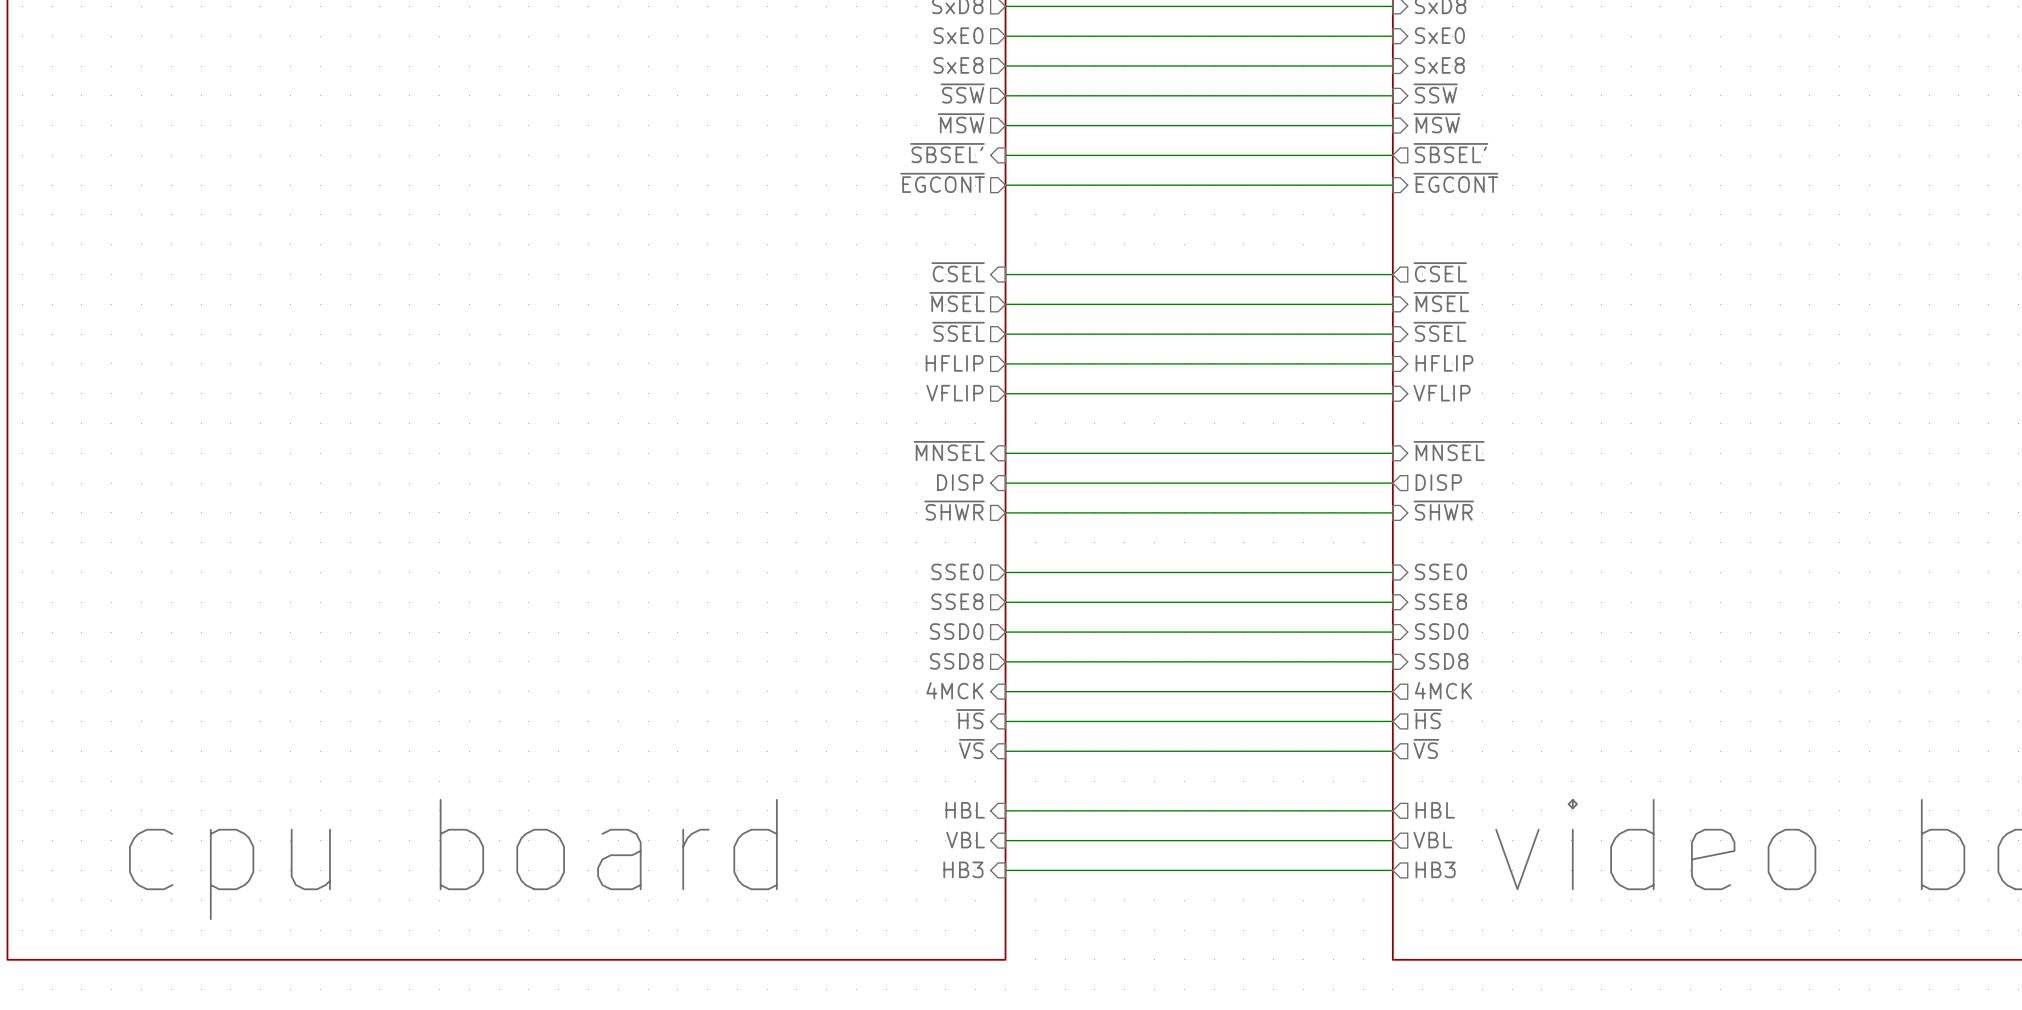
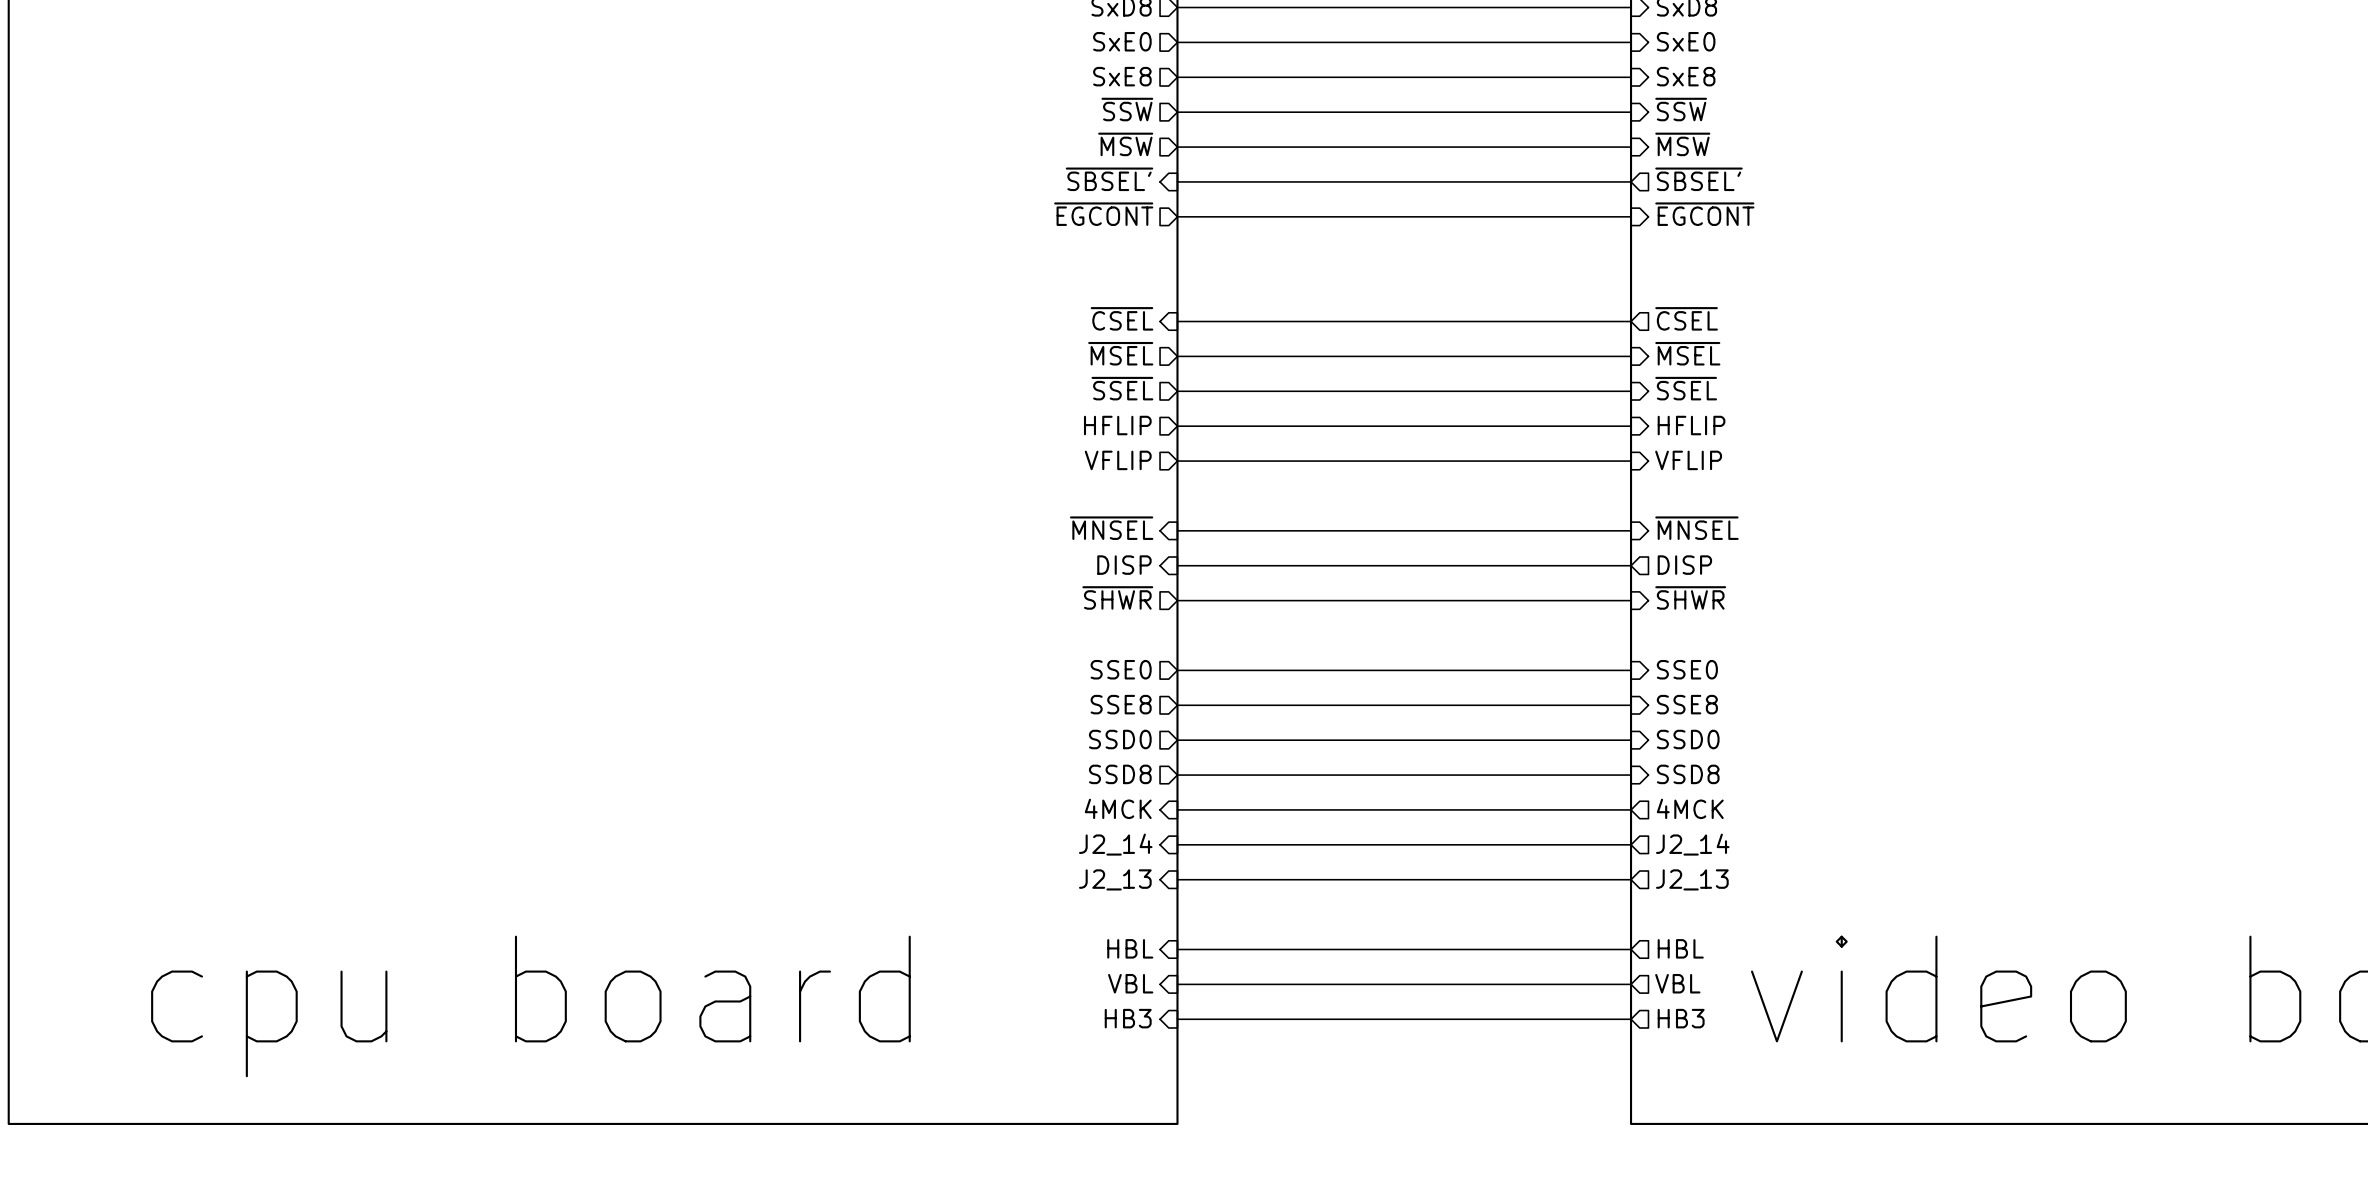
sheet pin: ~{HS} (970, 719) -> J2_14 (1115, 844)
sheet pin: ~{HS} (1427, 719) -> J2_14 (1692, 844)
sheet pin: ~{VS} (971, 748) -> J2_13 (1115, 879)
sheet pin: ~{VS} (1426, 748) -> J2_13 (1692, 879)

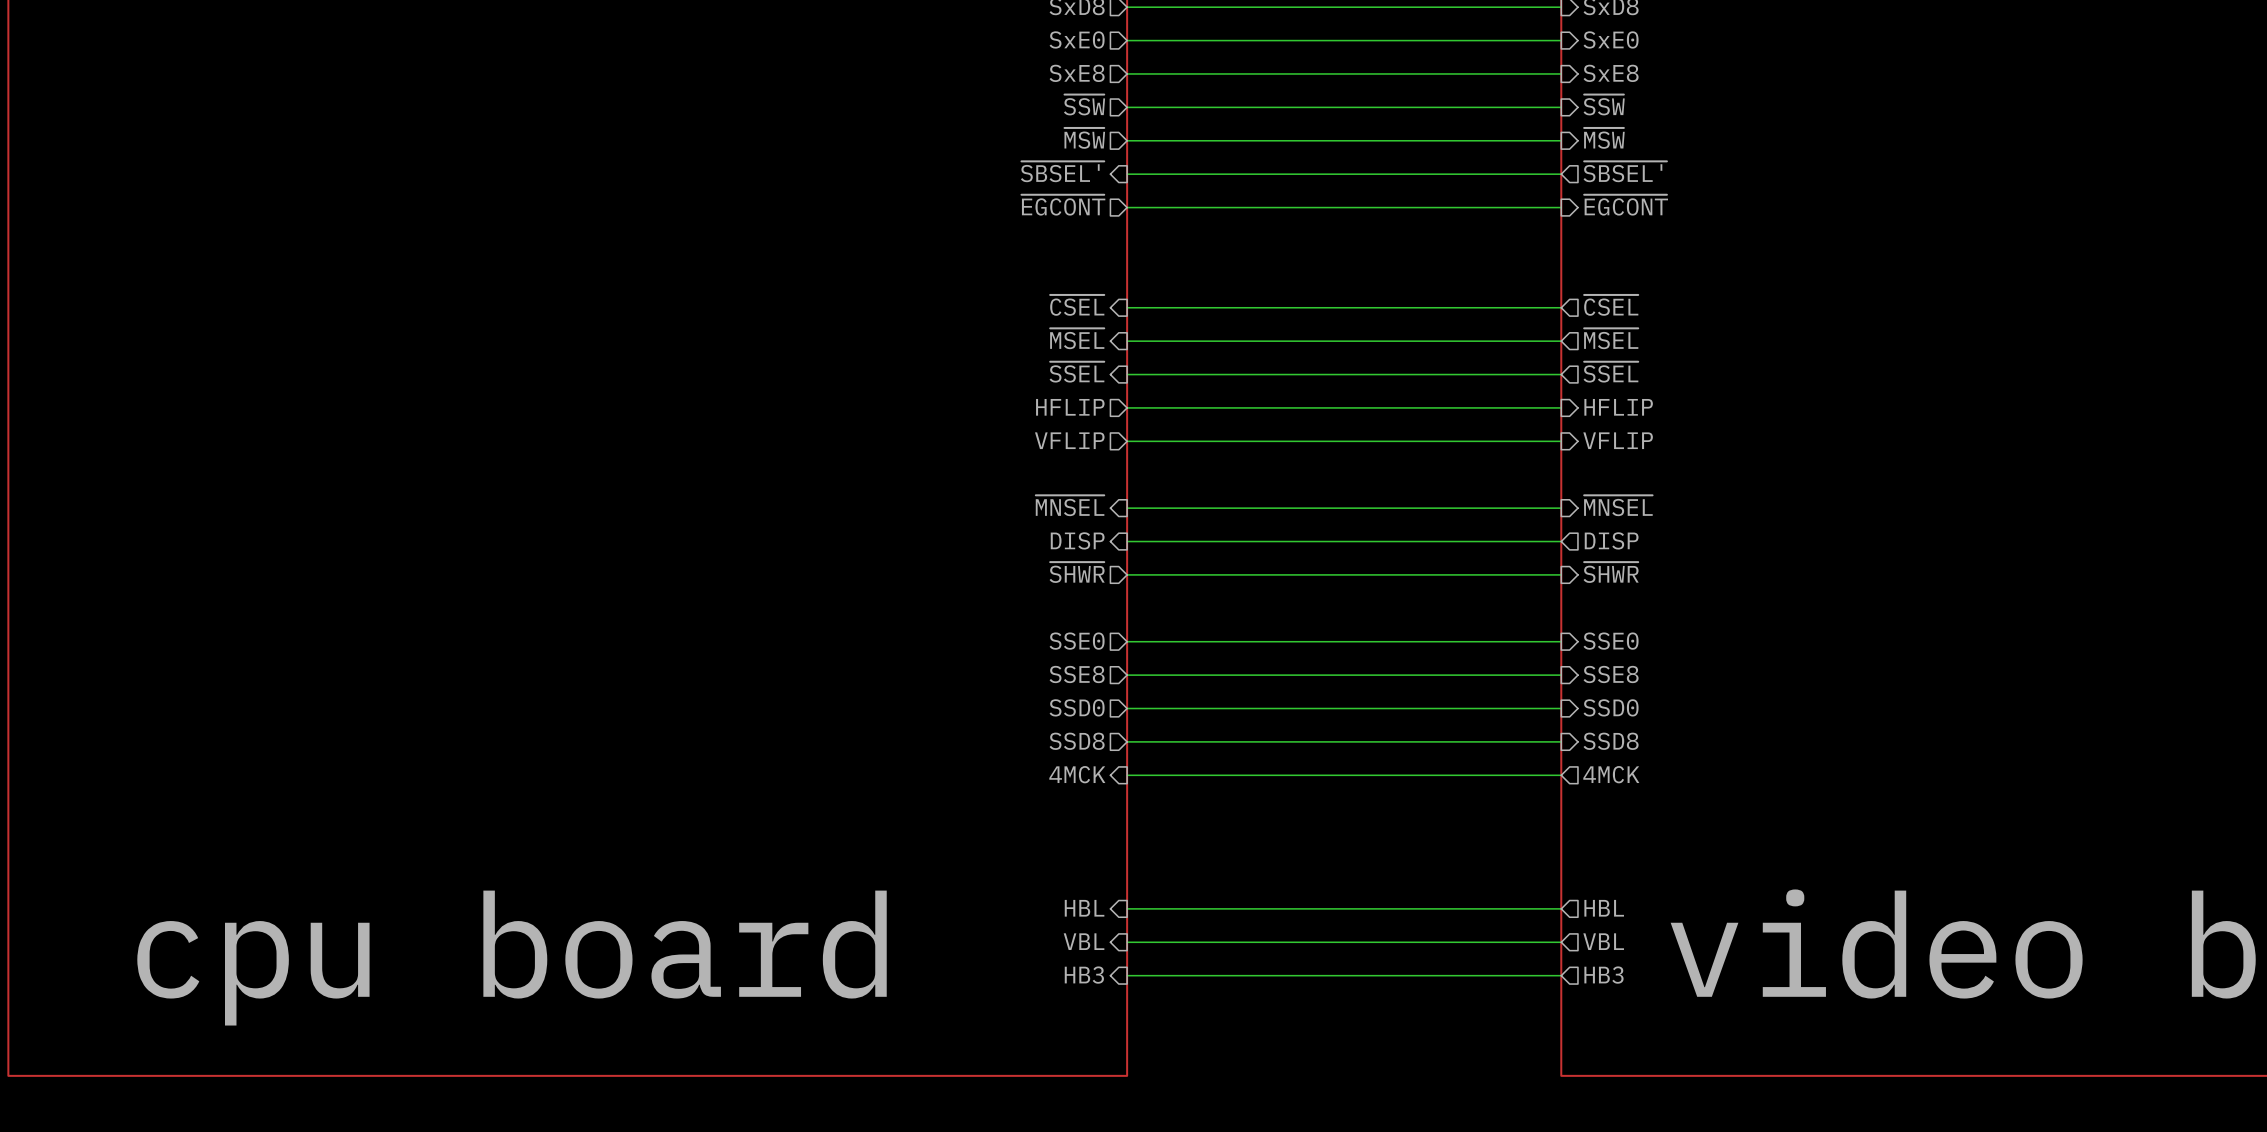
sheet pin shape: output (1120, 353) -> input (1077, 338)
sheet pin shape: input (1687, 353) -> output (1611, 338)
sheet pin shape: output (1122, 388) -> input (1076, 372)
sheet pin shape: input (1686, 388) -> output (1610, 372)
sheet pin: J2_14 (1115, 844) -> none
wire: (1177, 844) (1631, 844) -> none
sheet pin: J2_14 (1692, 844) -> none
sheet pin: J2_13 (1115, 879) -> none
wire: (1177, 879) (1631, 879) -> none
sheet pin: J2_13 (1692, 879) -> none

